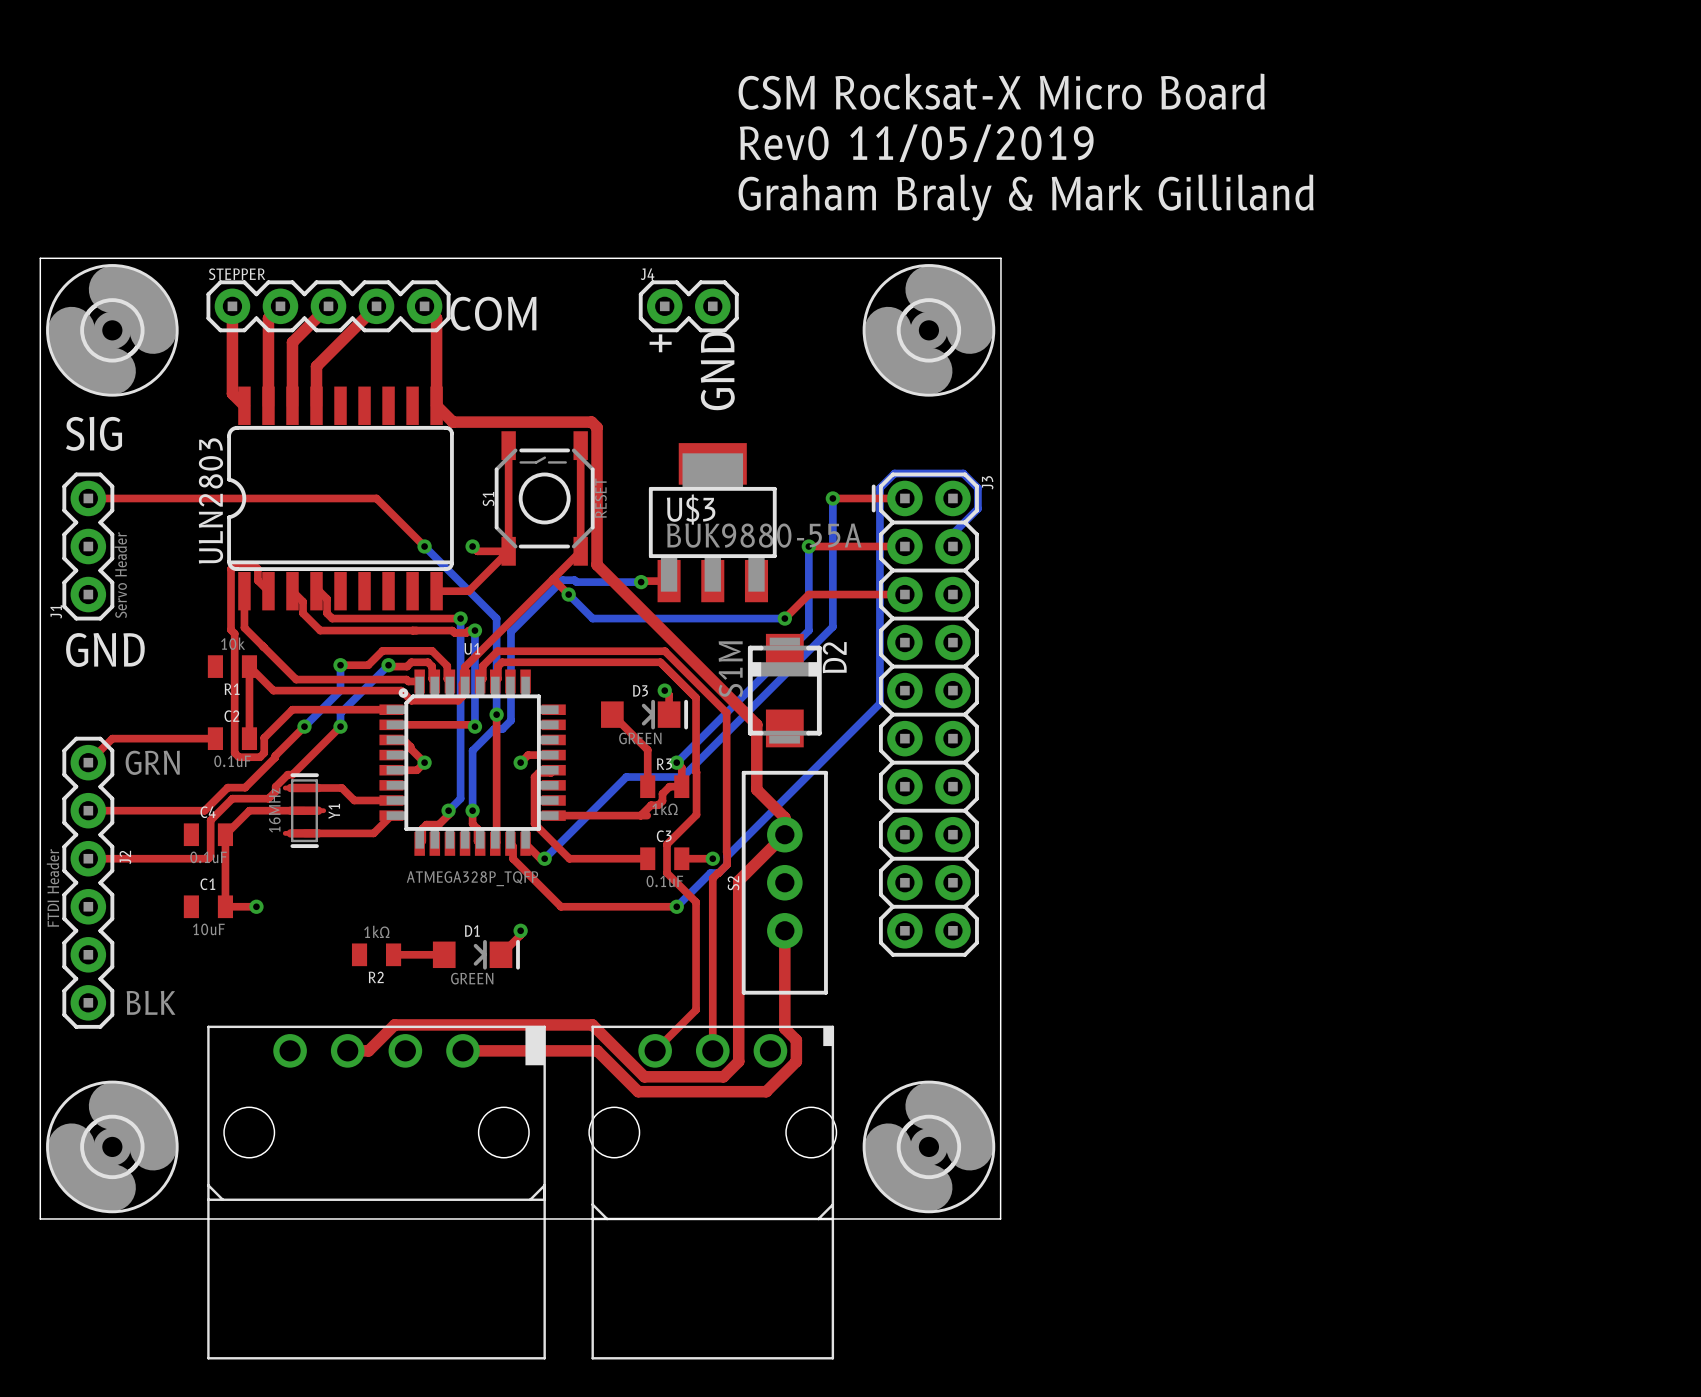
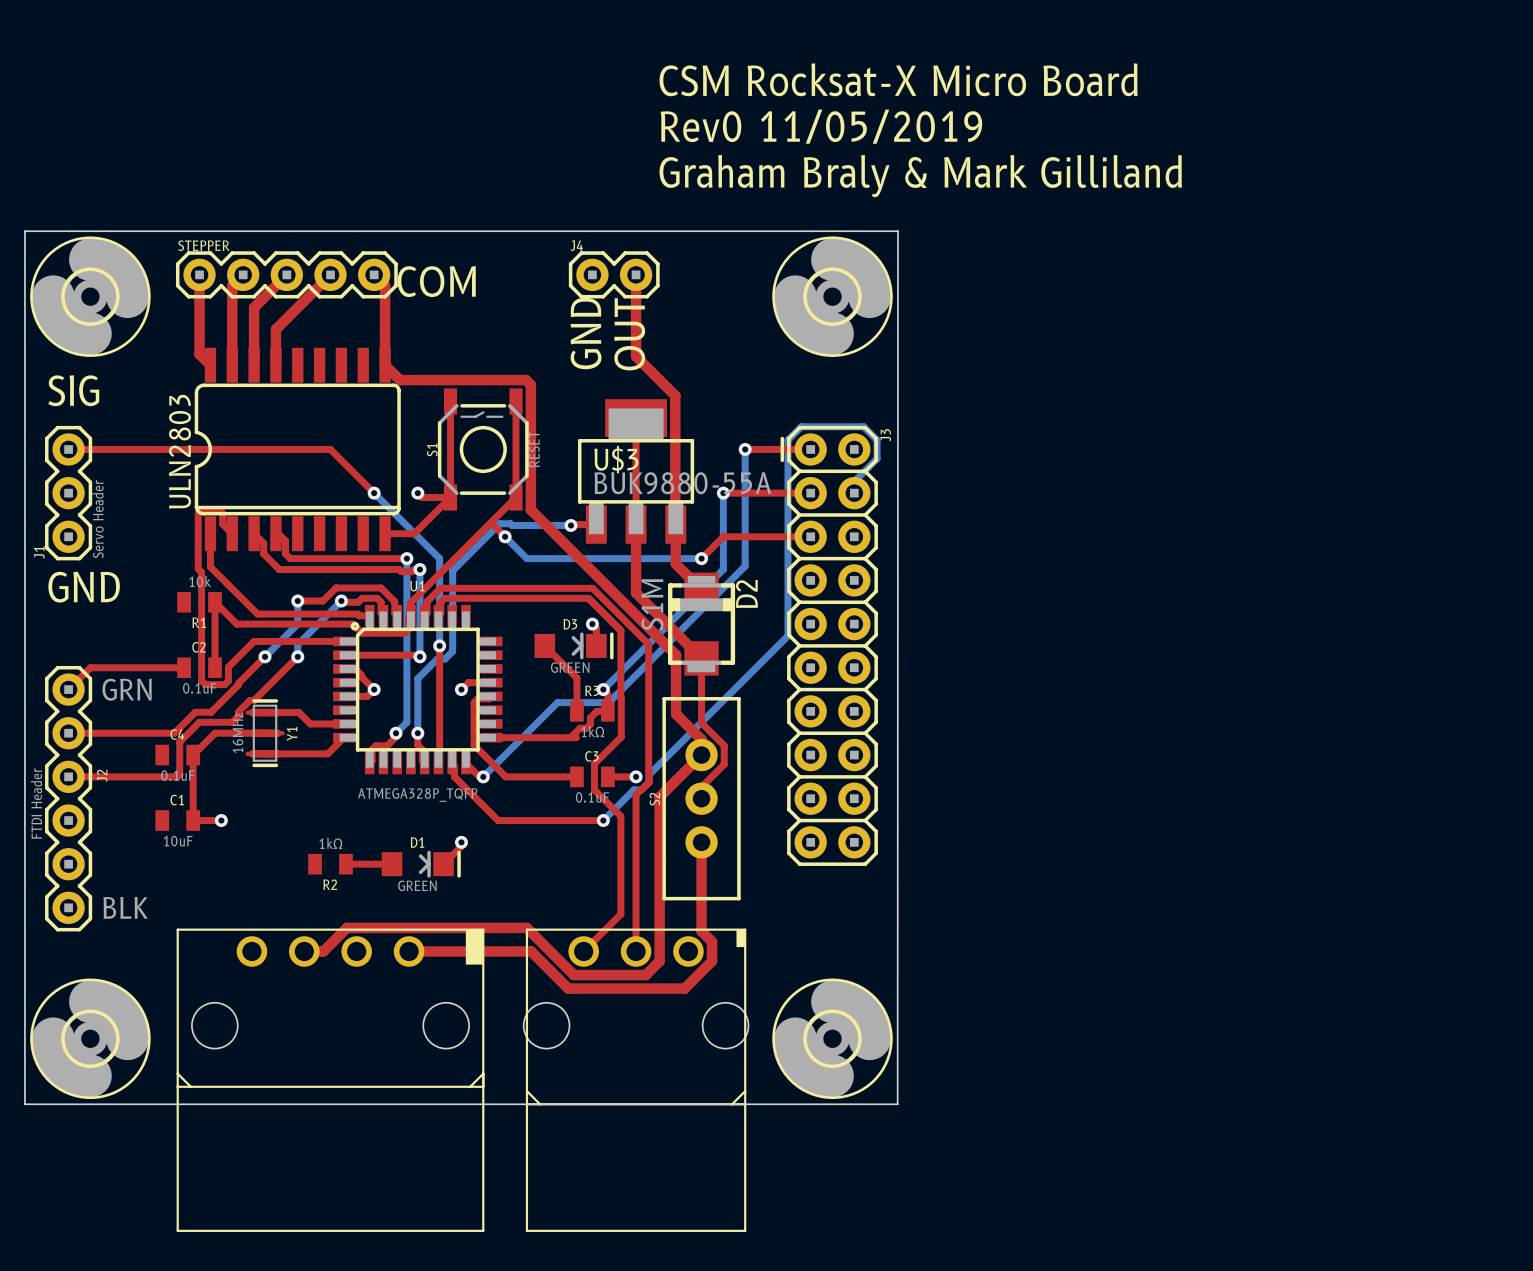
top track: none -> (636, 274) (636, 356) (675, 395) (675, 524)
text: + (660, 343) -> GND (586, 333)
text: GND (717, 370) -> OUT (629, 334)
top track: none -> (636, 418) (636, 592) (701, 658) (701, 722) (724, 745) (724, 764) (701, 787) (701, 798)
top track: none -> (674, 523) (675, 563) (701, 589)

